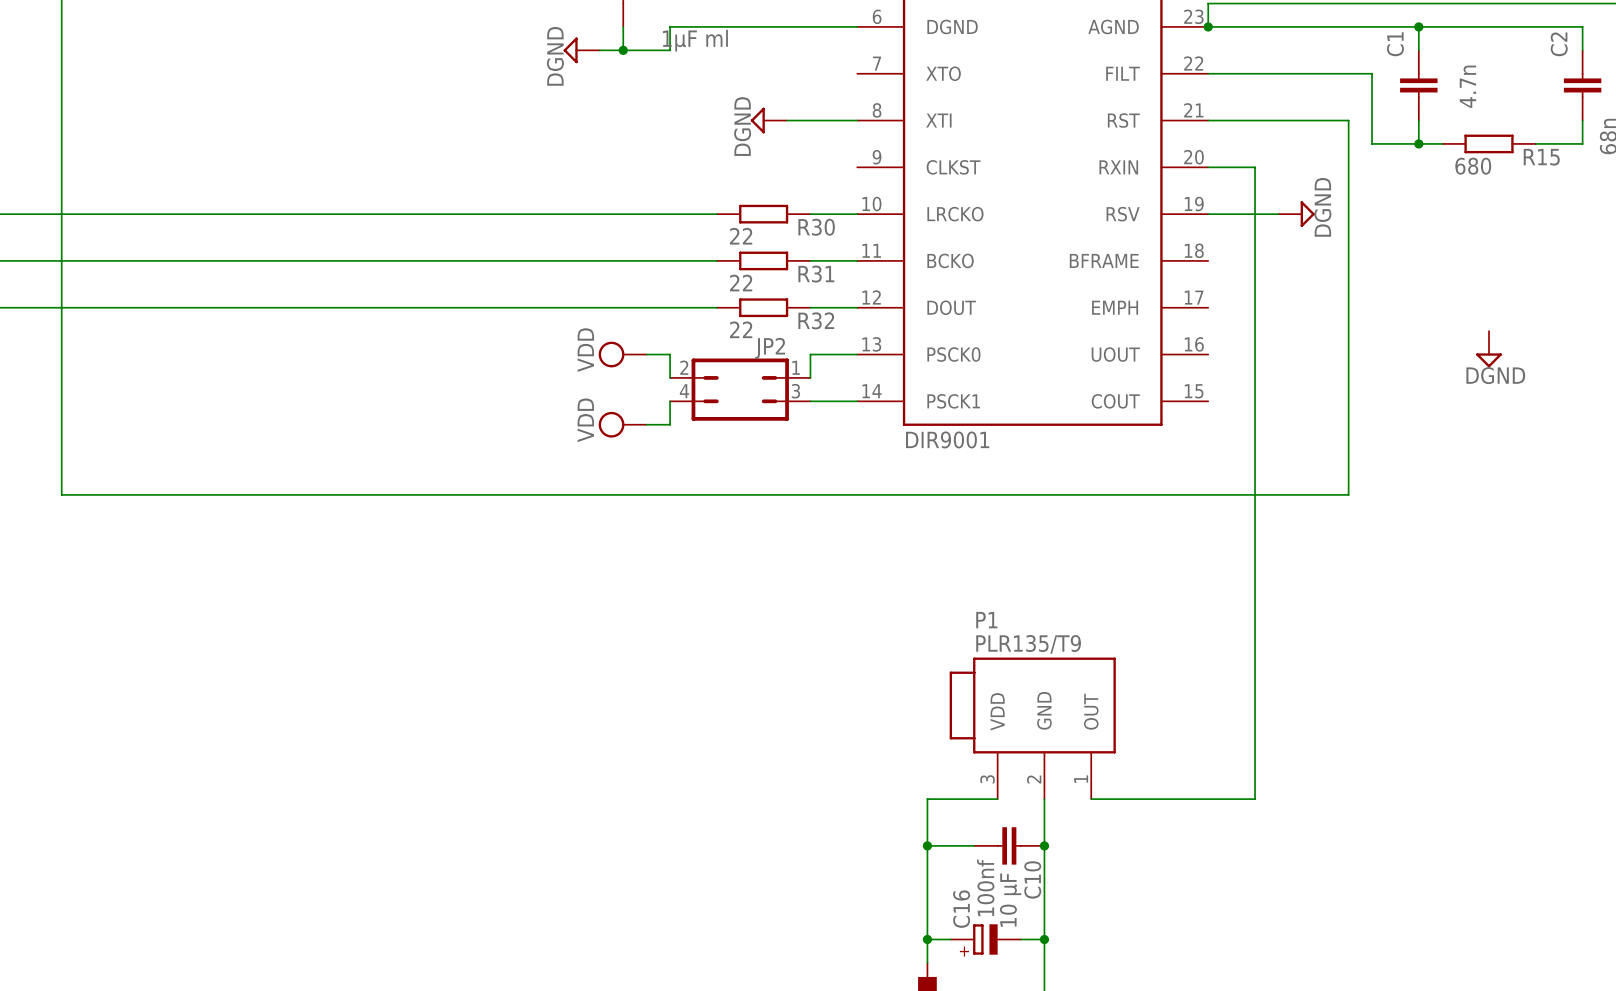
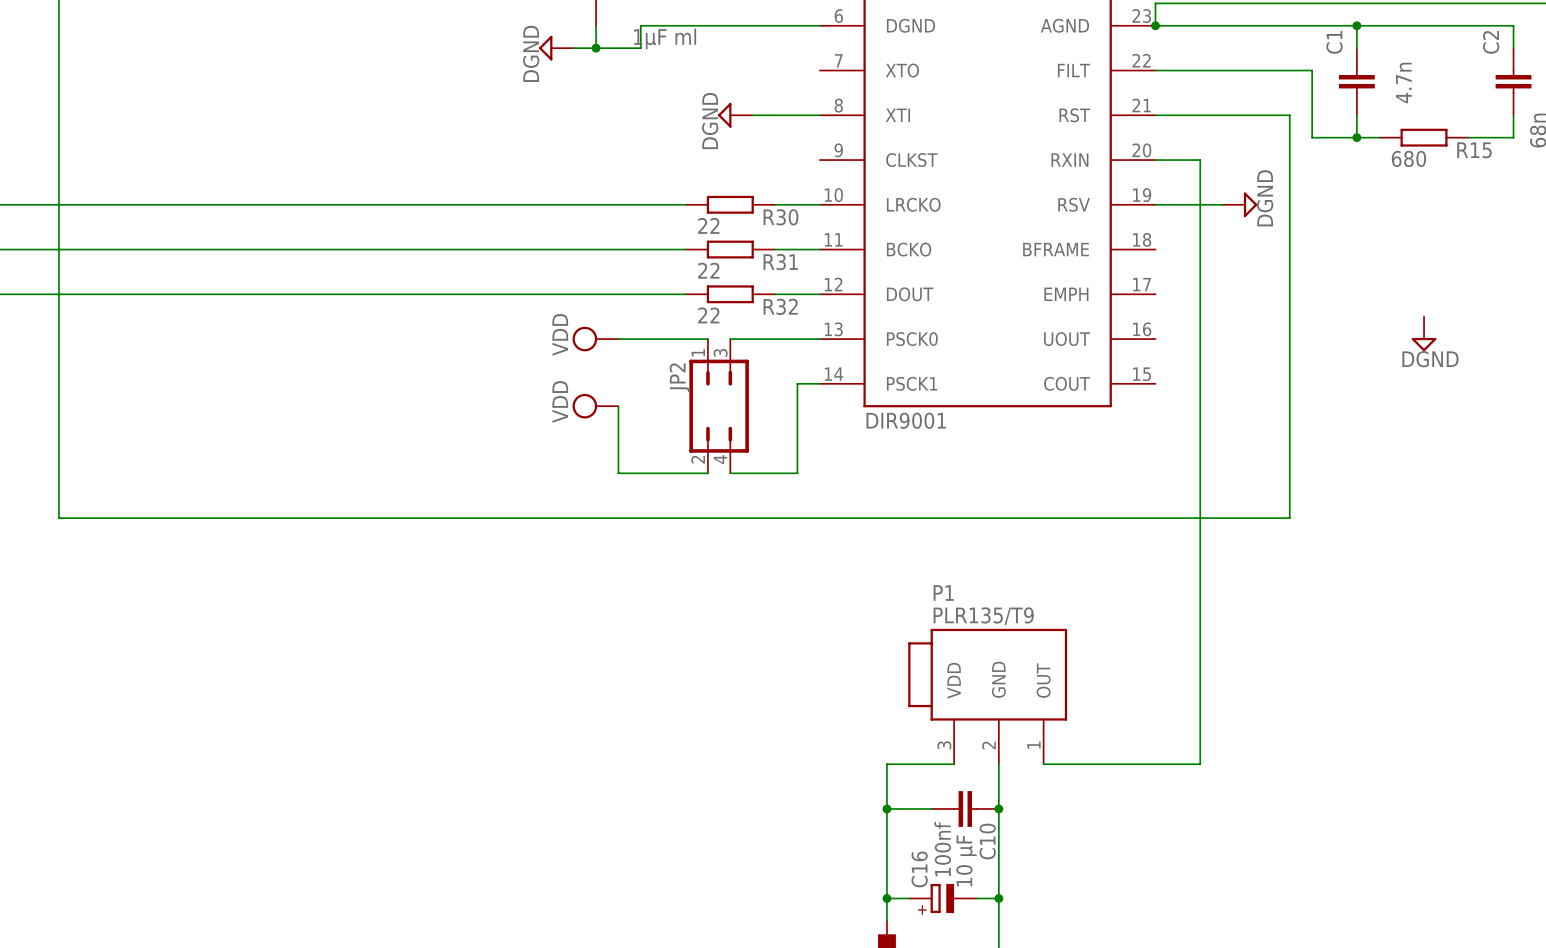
wire: (670, 354) (670, 377) -> (640, 339) (707, 339)
wire: (810, 354) (810, 377) -> (775, 339) (730, 339)
JP2 rotation: 0° (740, 389) -> 90° counterclockwise (719, 406)
wire: (670, 401) (670, 424) (646, 424) -> (618, 473) (618, 406)
wire: (810, 401) (833, 401) -> (797, 473) (797, 383)
wire: (61, 494) (646, 494) -> (59, 473) (59, 518) (1289, 518) (1289, 473)
wire: (740, 494) (763, 494) -> none
wire: (833, 494) (1348, 494) -> none

